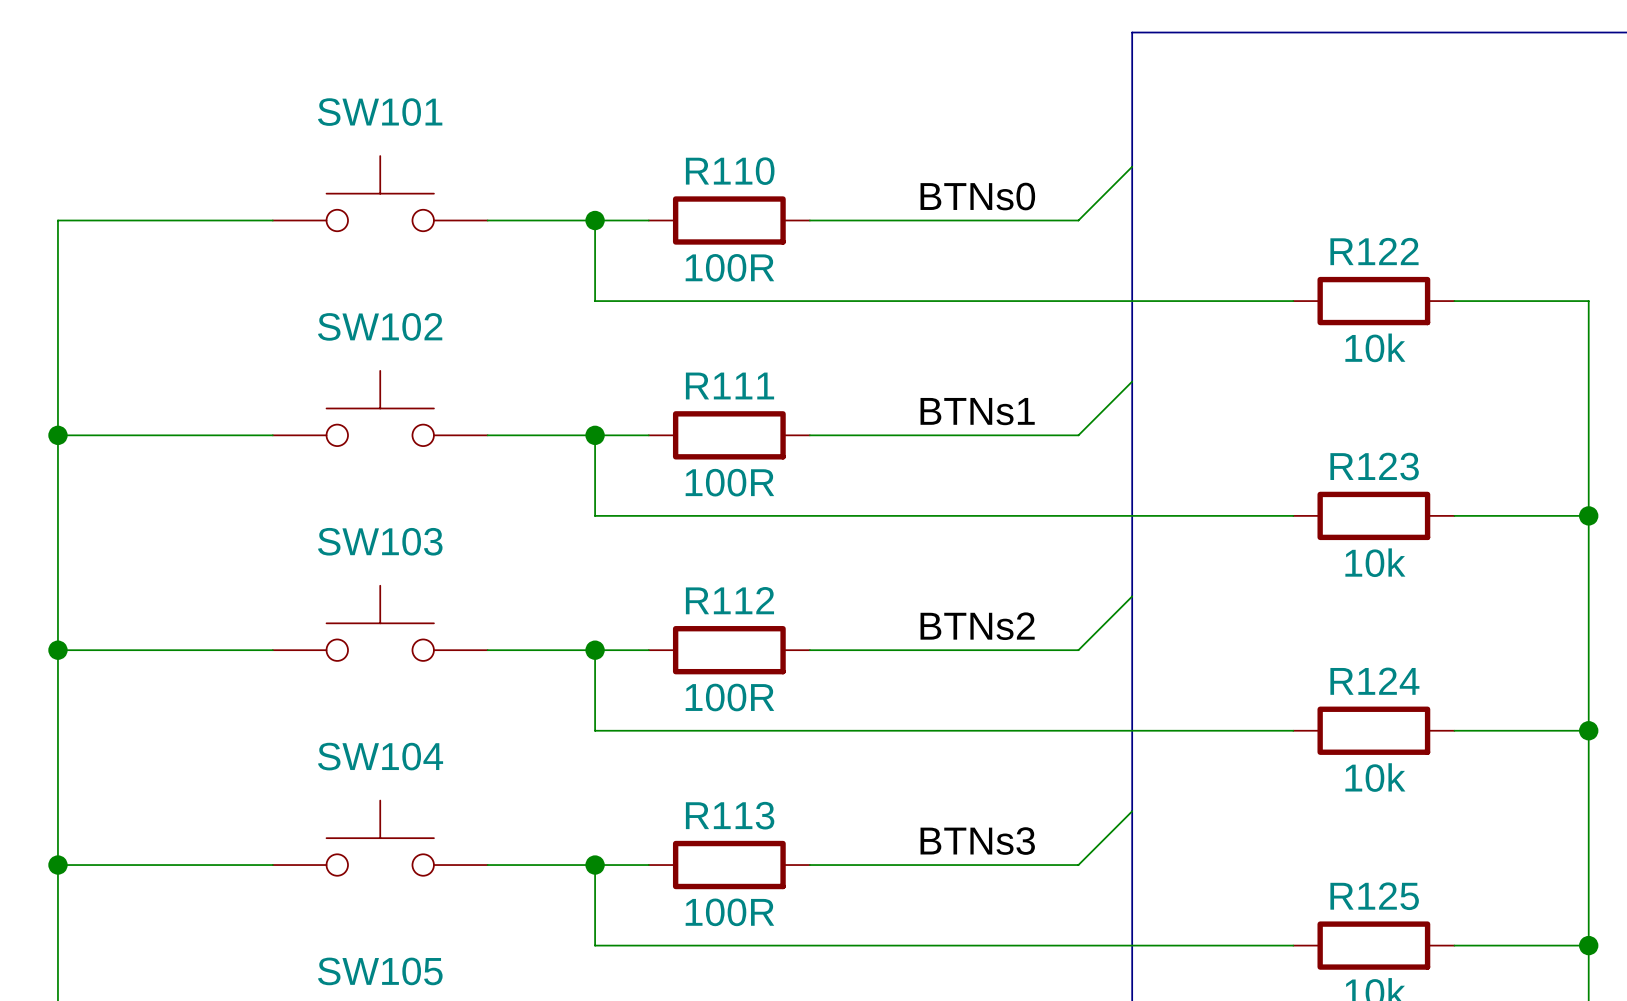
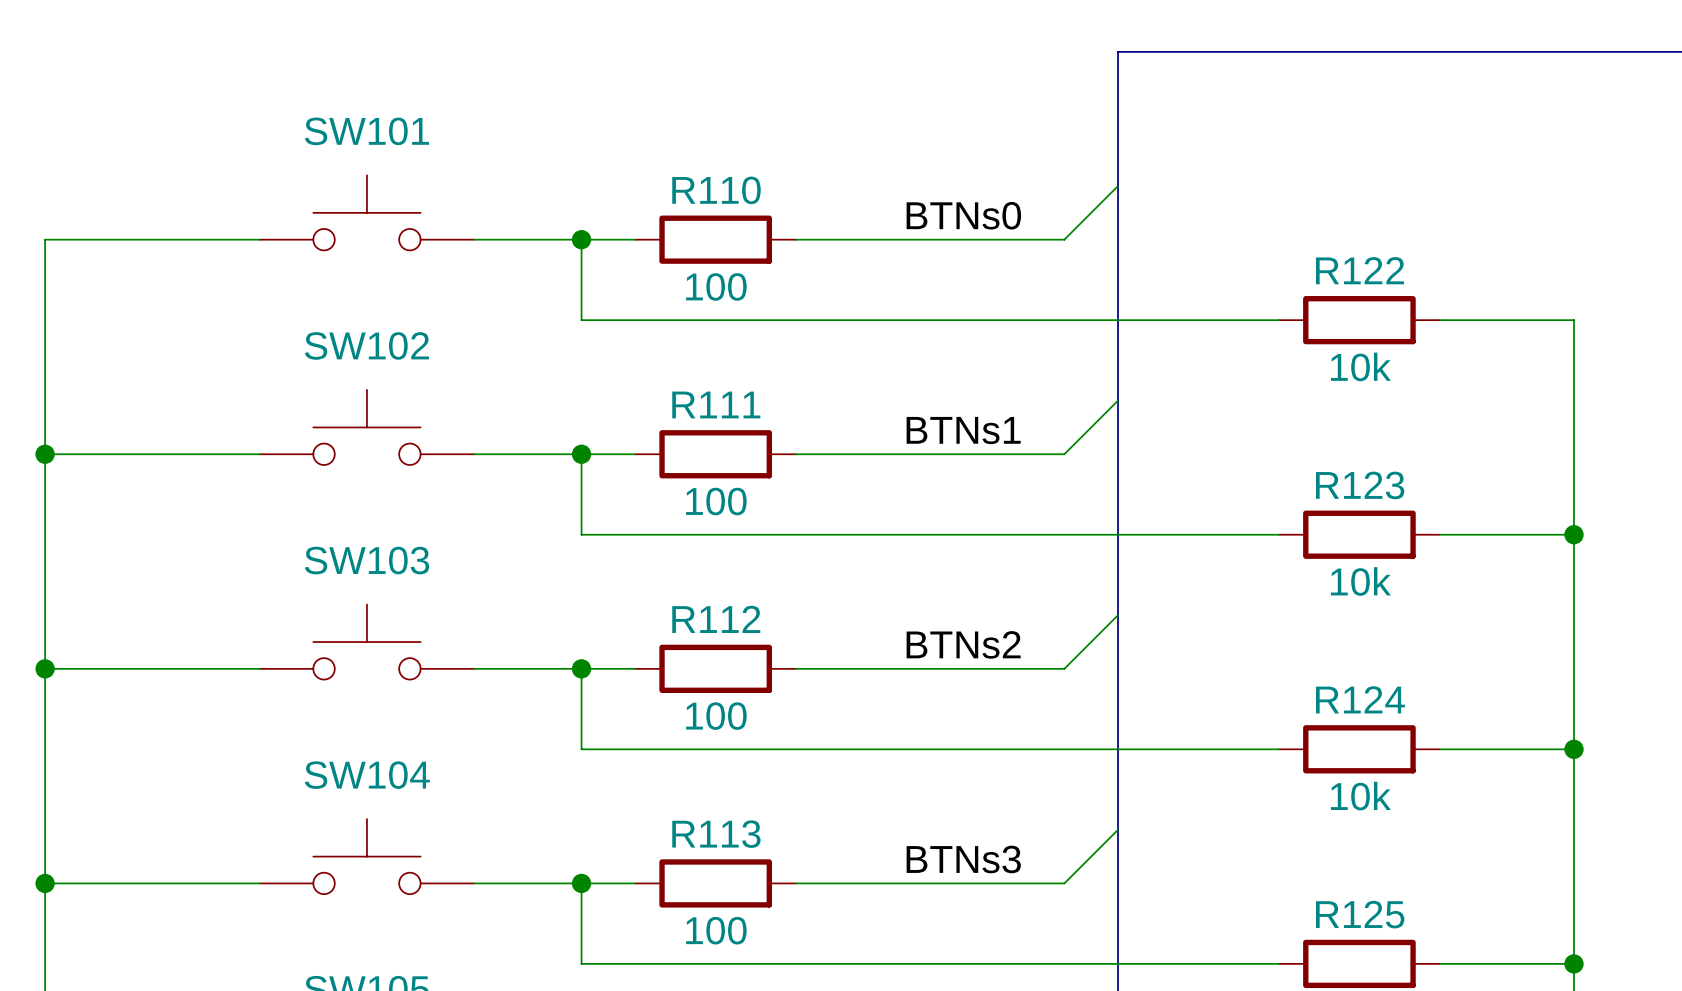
R110 value: 100R (729, 267) -> 100 (716, 286)
R111 value: 100R (729, 482) -> 100 (716, 501)
R112 value: 100R (729, 697) -> 100 (716, 716)
R113 value: 100R (729, 912) -> 100 (716, 930)

